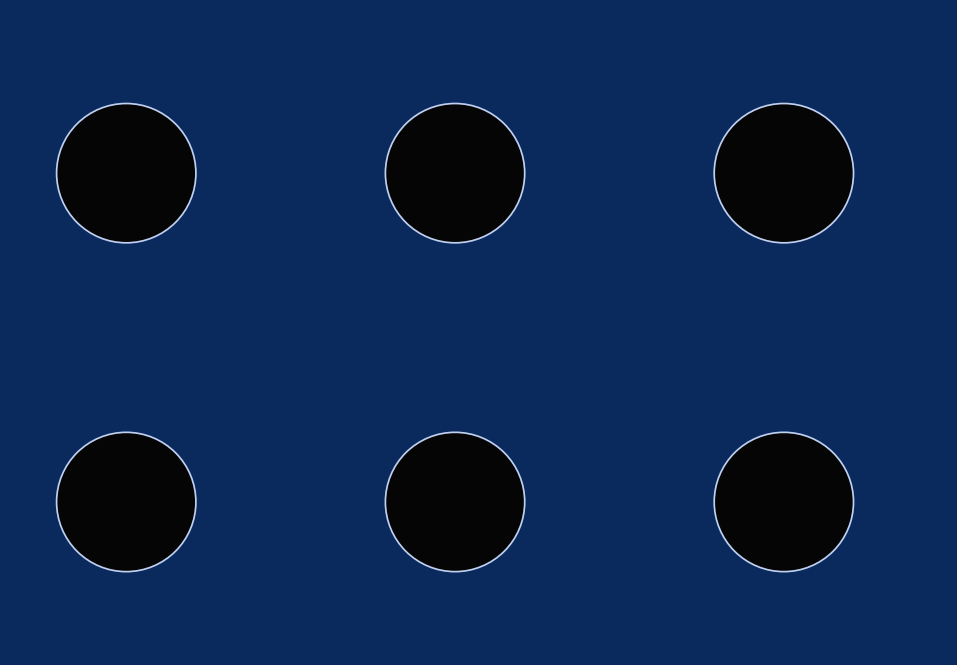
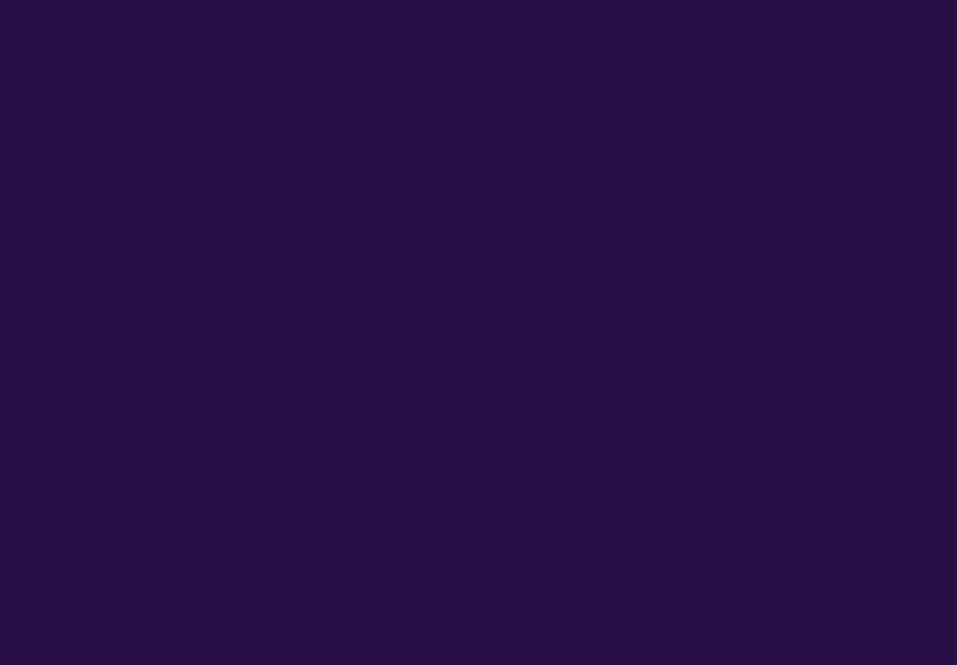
part: (126, 173) -> none
part: (455, 173) -> none
part: (783, 173) -> none
part: (126, 501) -> none
part: (455, 501) -> none
part: (783, 501) -> none

